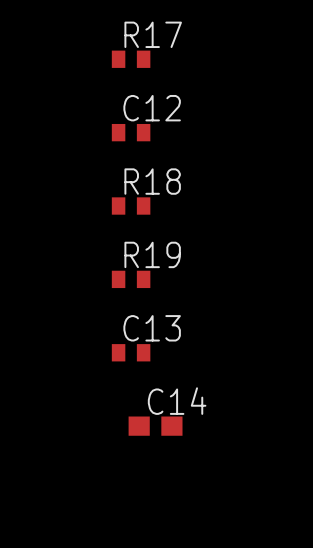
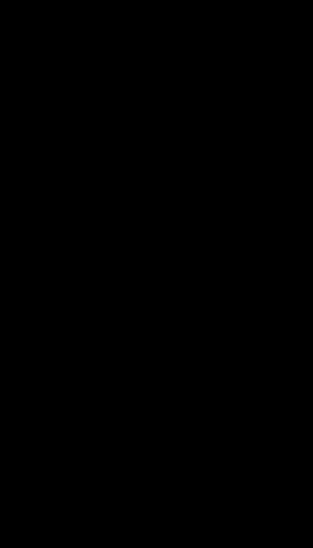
R17: (131, 59) -> none
C12: (131, 132) -> none
R18: (131, 206) -> none
R19: (131, 279) -> none
C13: (131, 352) -> none
C14: (155, 426) -> none

